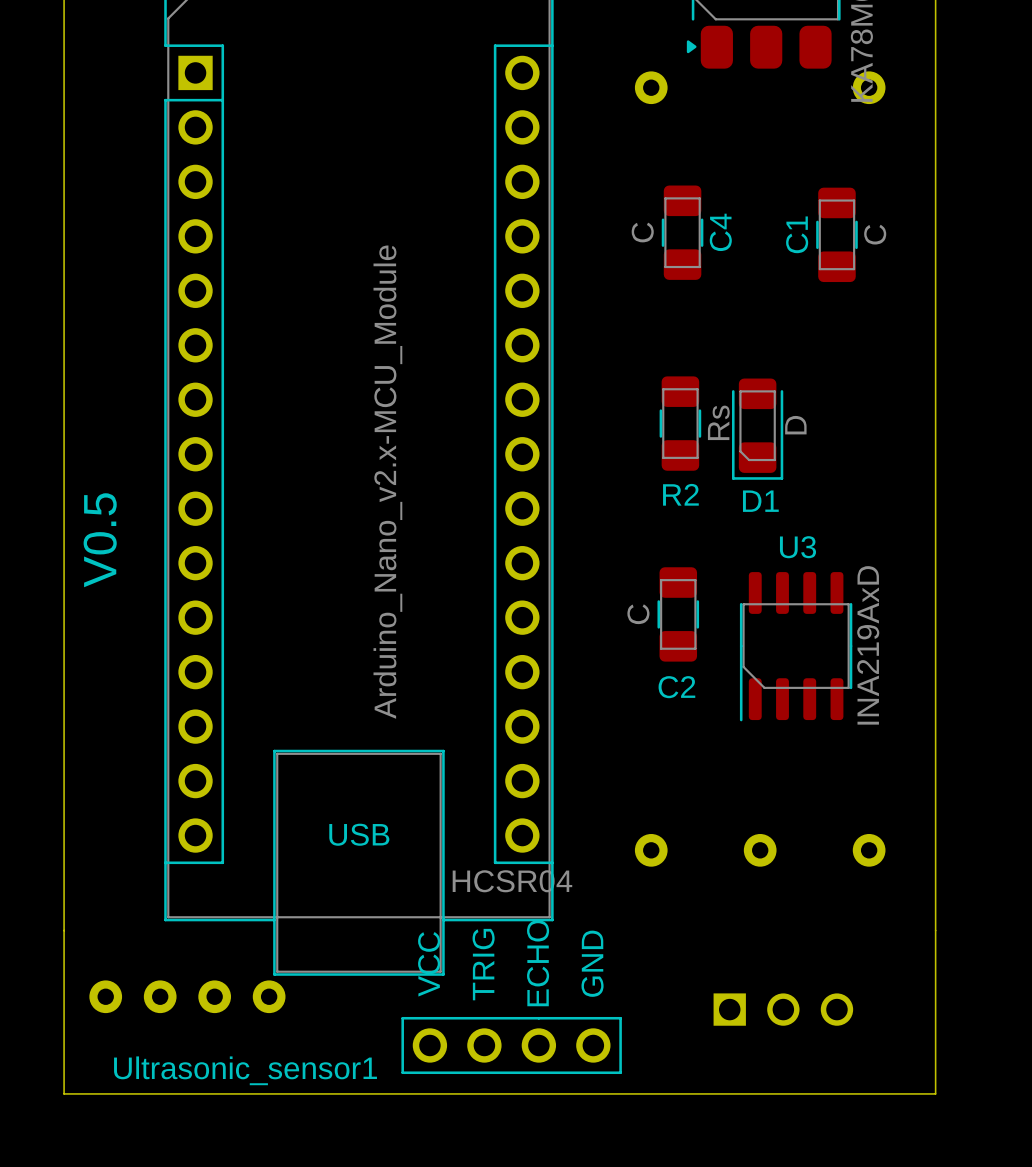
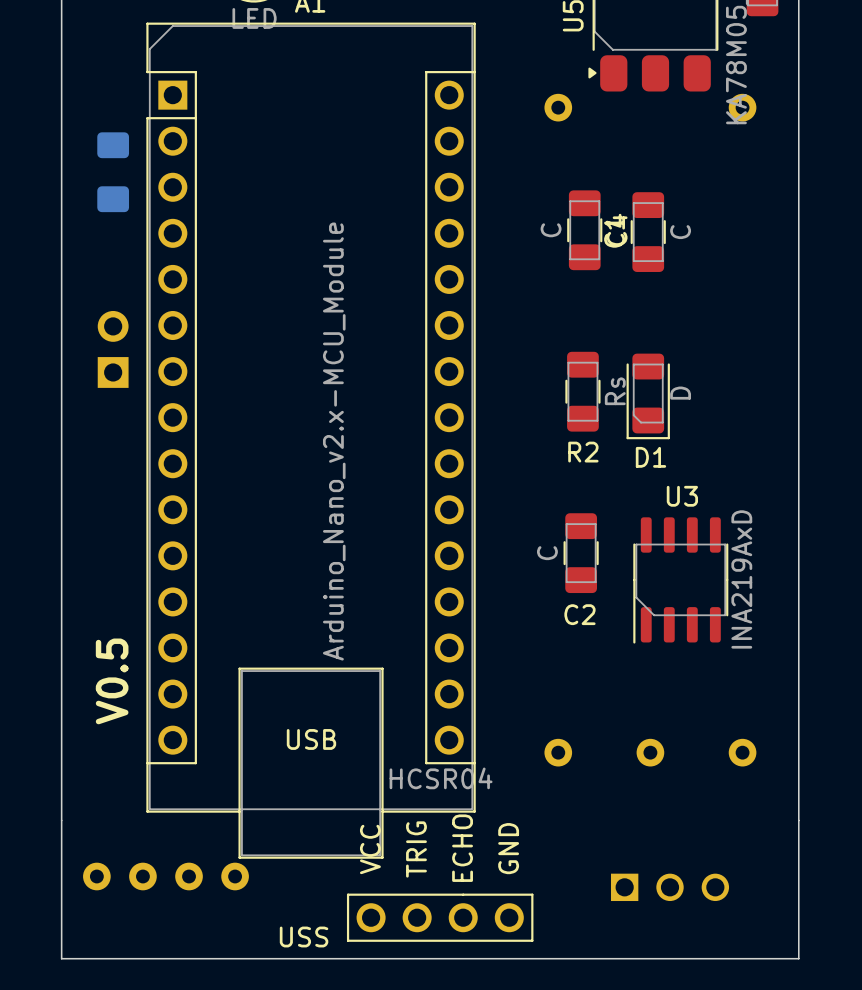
part: none -> (113, 172)
C1 position: (836, 234) -> (648, 232)
part: none -> (113, 349)
text position: V0.5 (100, 540) -> V0.5 (112, 681)
Ultrasonic_sensor1 name: Ultrasonic_sensor1 (245, 1070) -> USS (304, 936)

